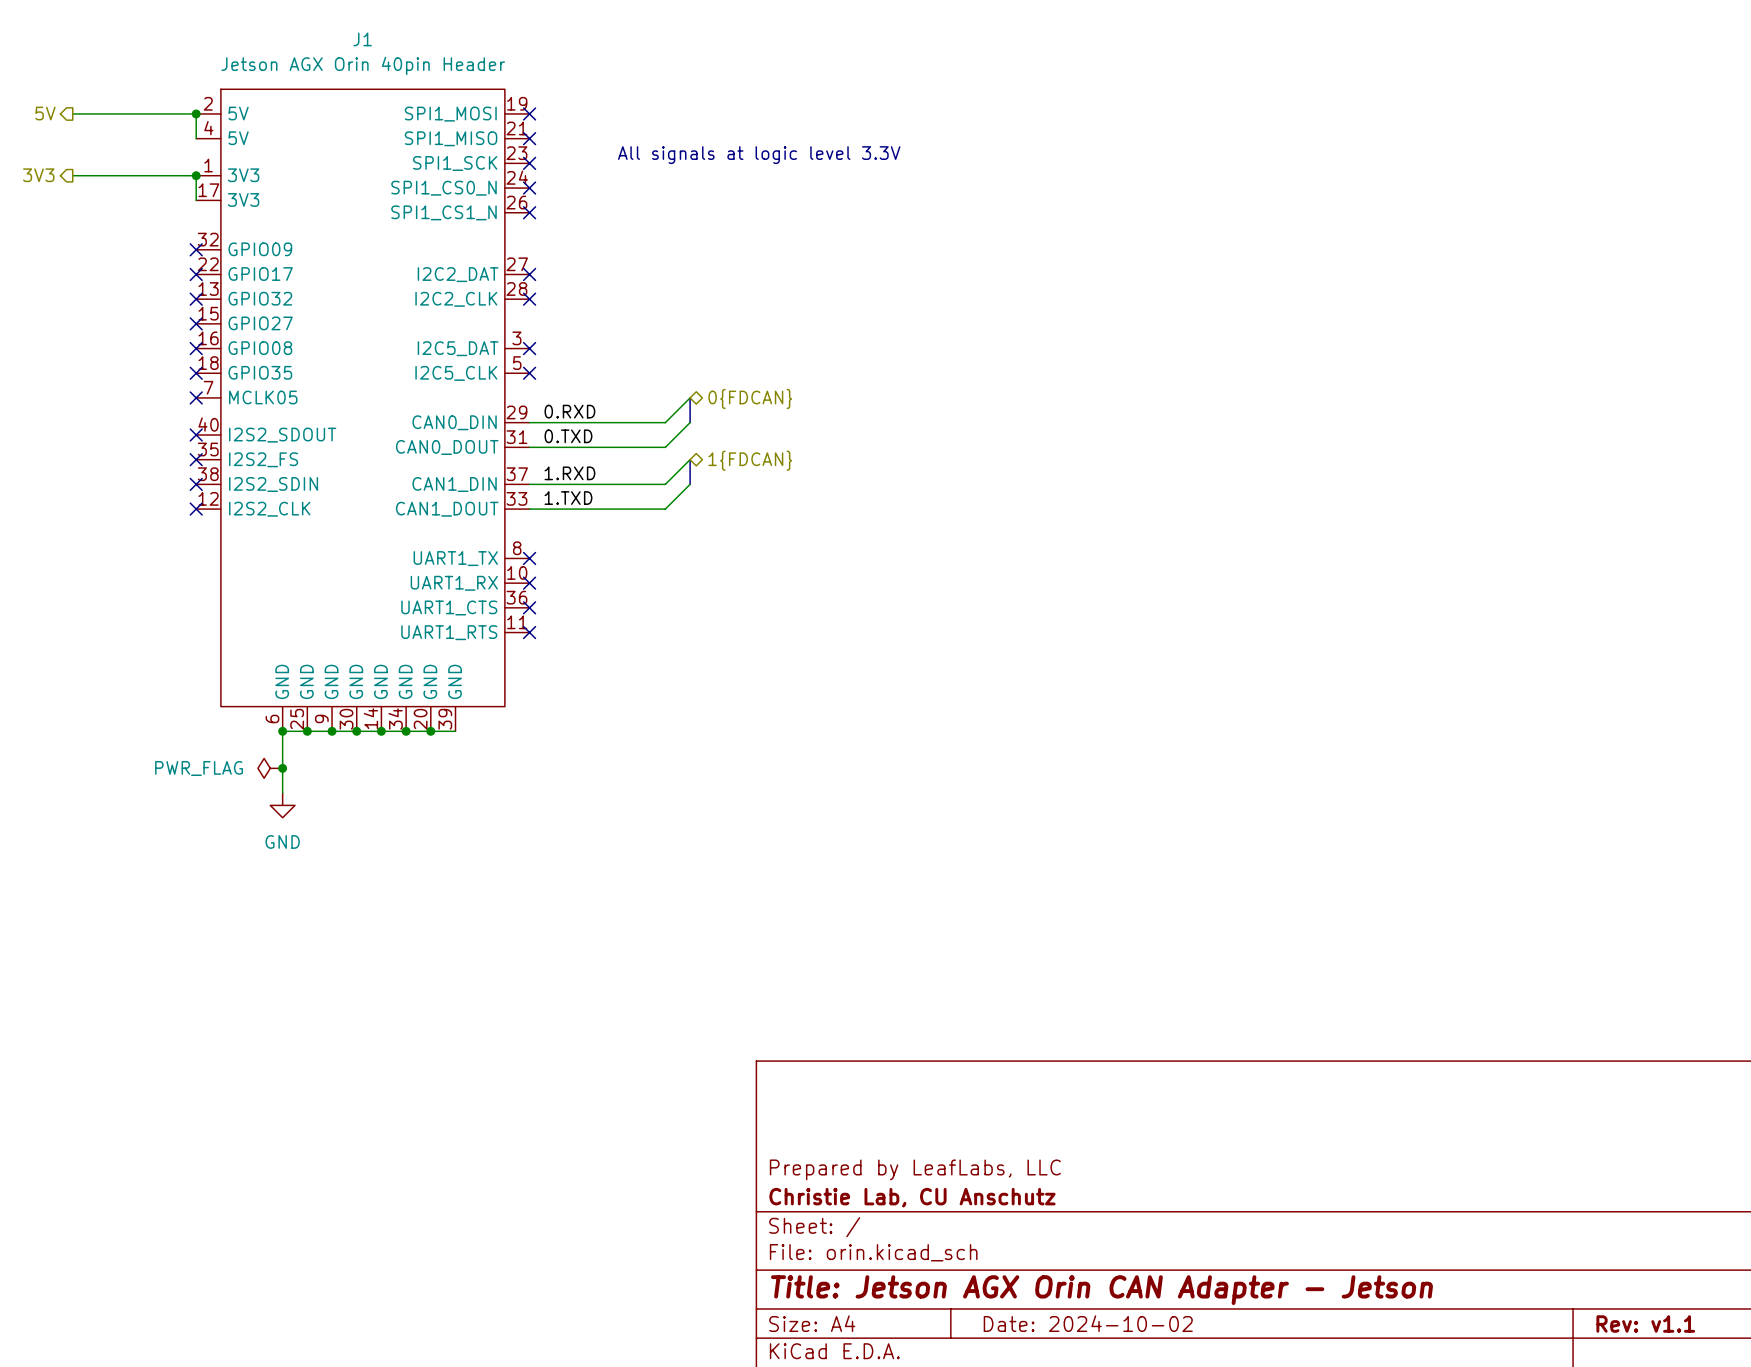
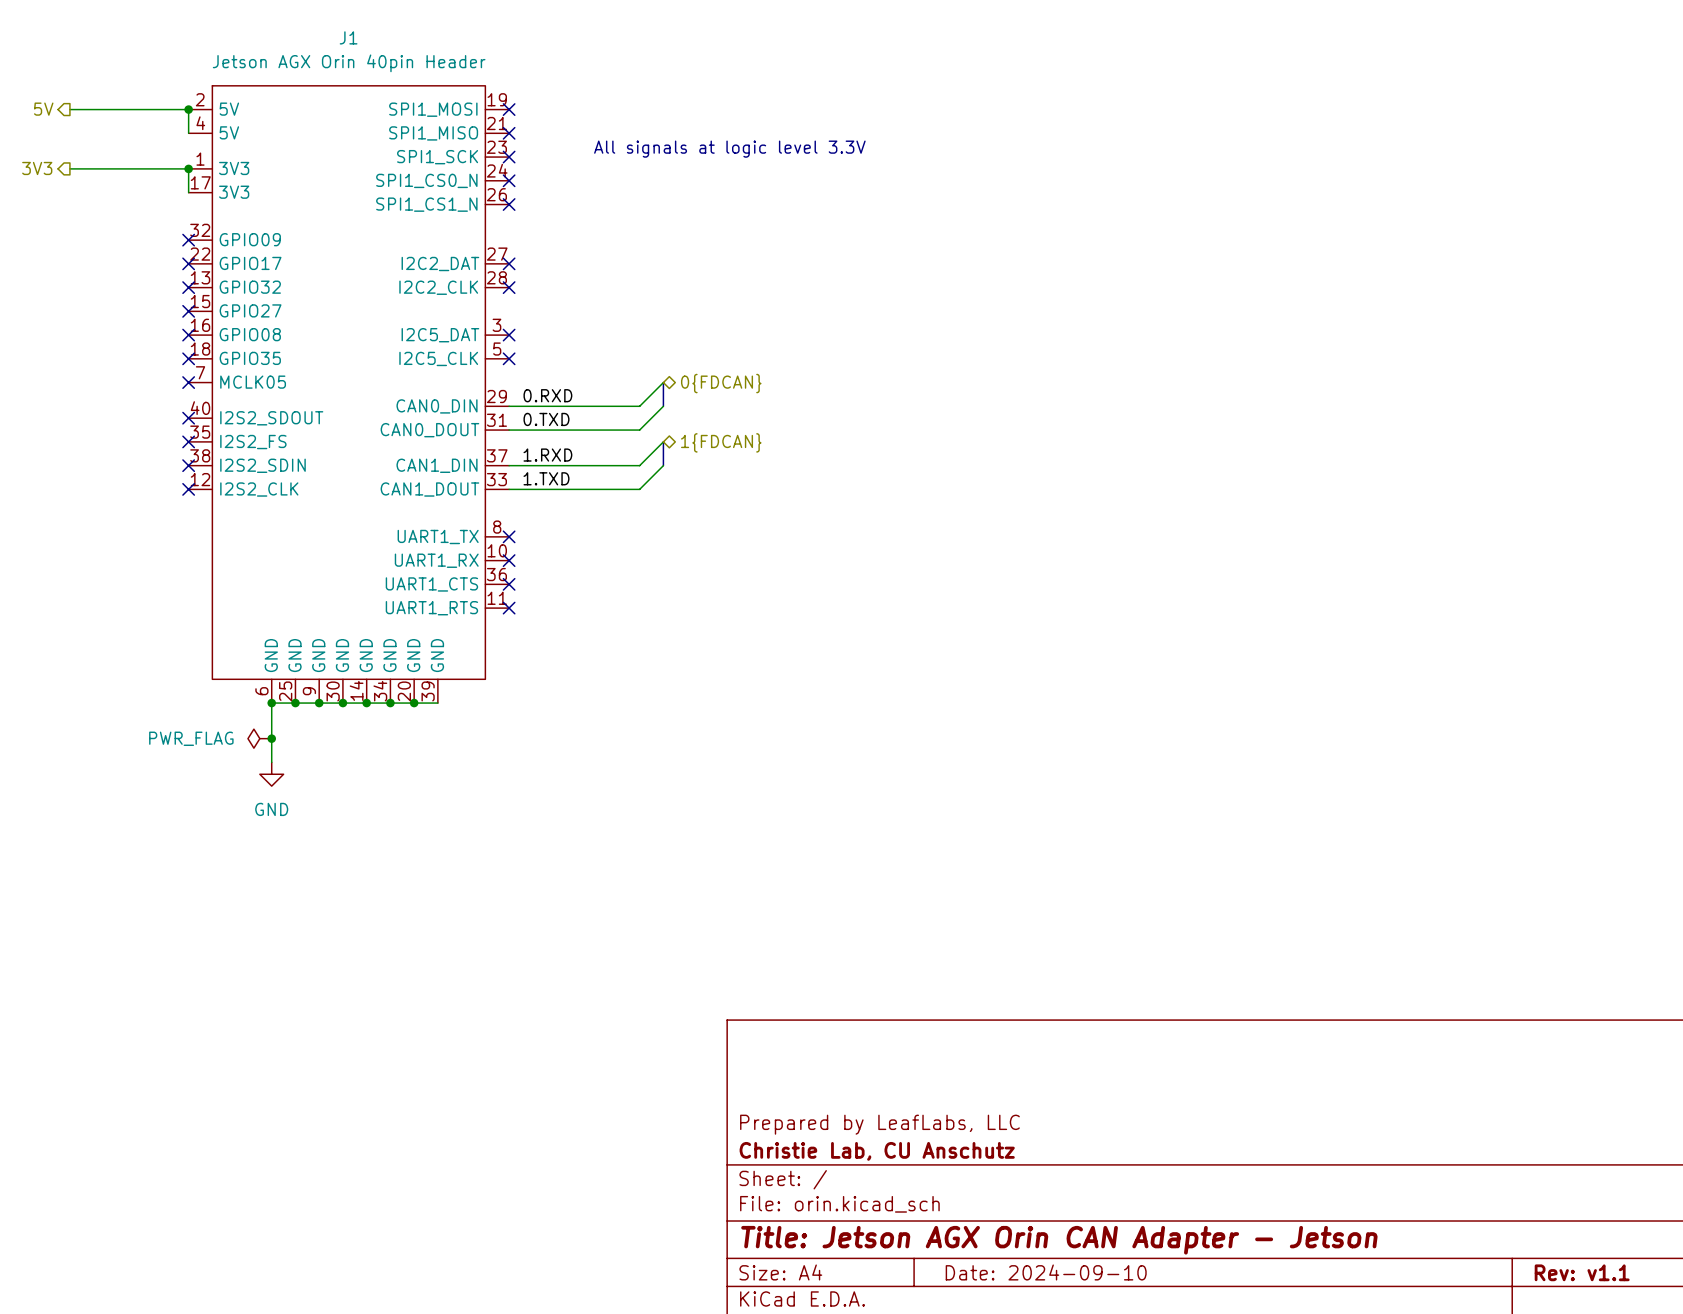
title block: Date: 2024-10-02 (1088, 1323) -> Date: 2024-09-10 (1046, 1272)

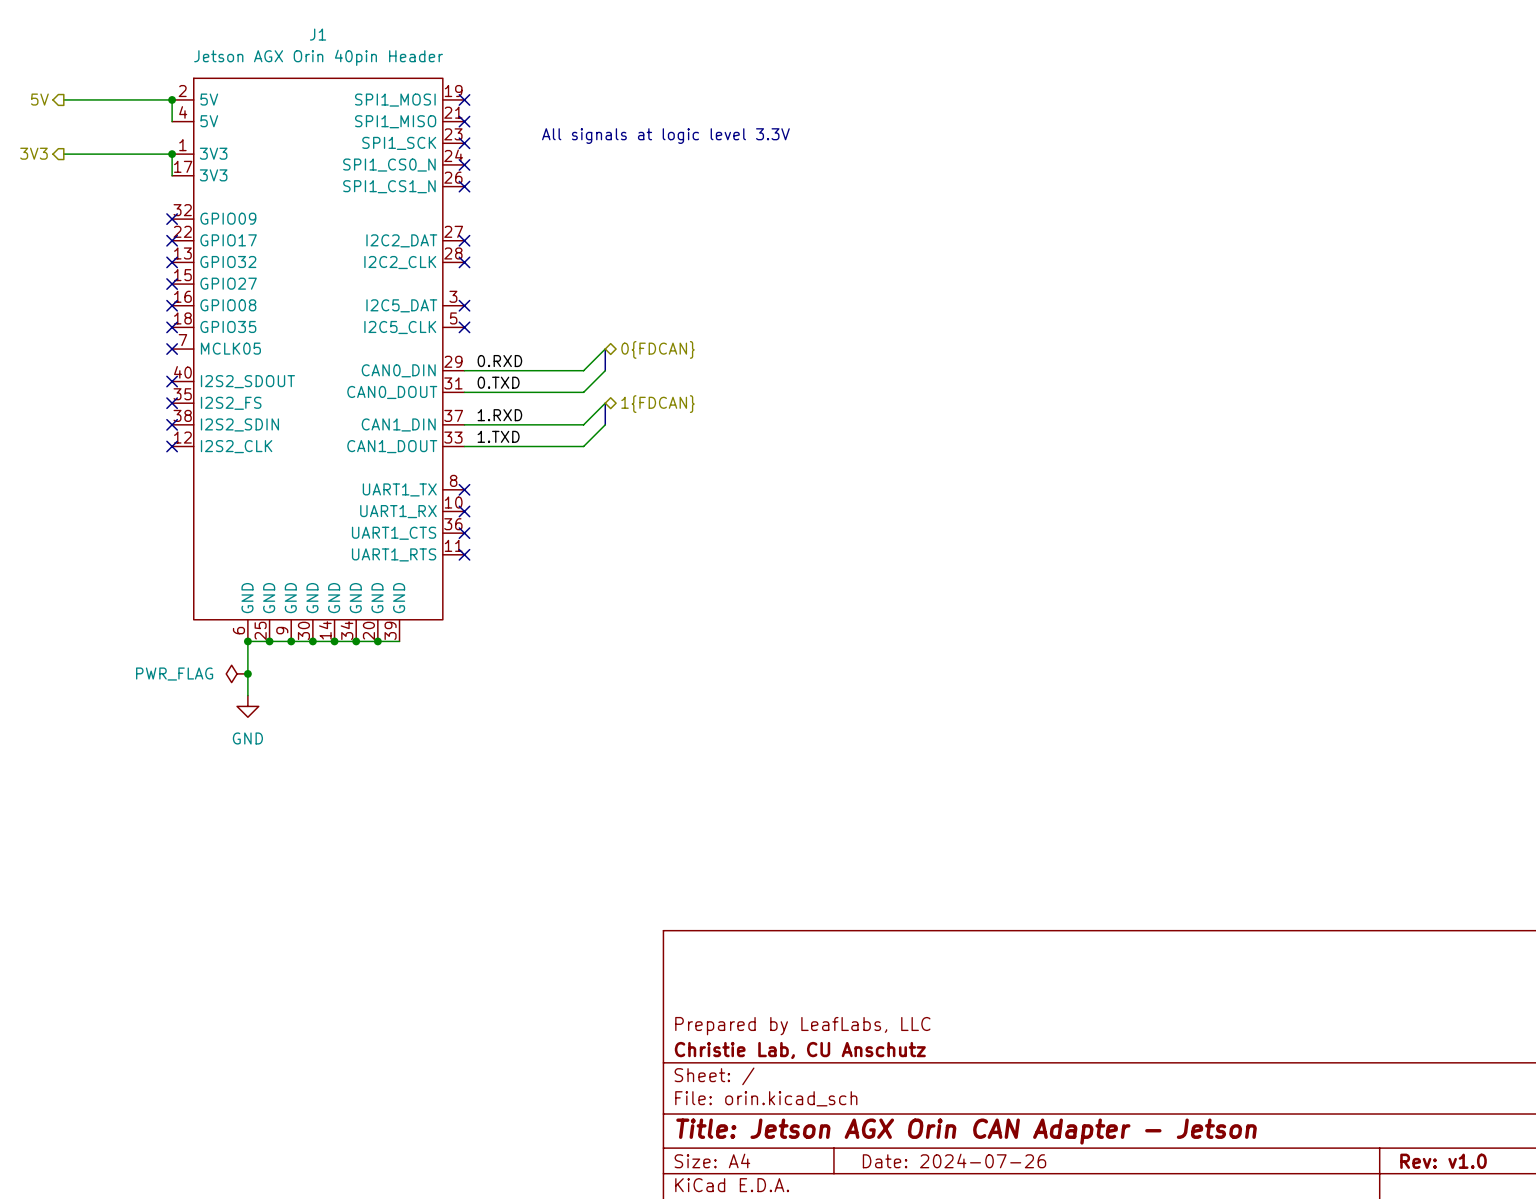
title block: Date: 2024-09-10 (1046, 1272) -> Date: 2024-07-26 (954, 1160)
title block: Rev: v1.1 (1582, 1272) -> Rev: v1.0 (1443, 1161)

